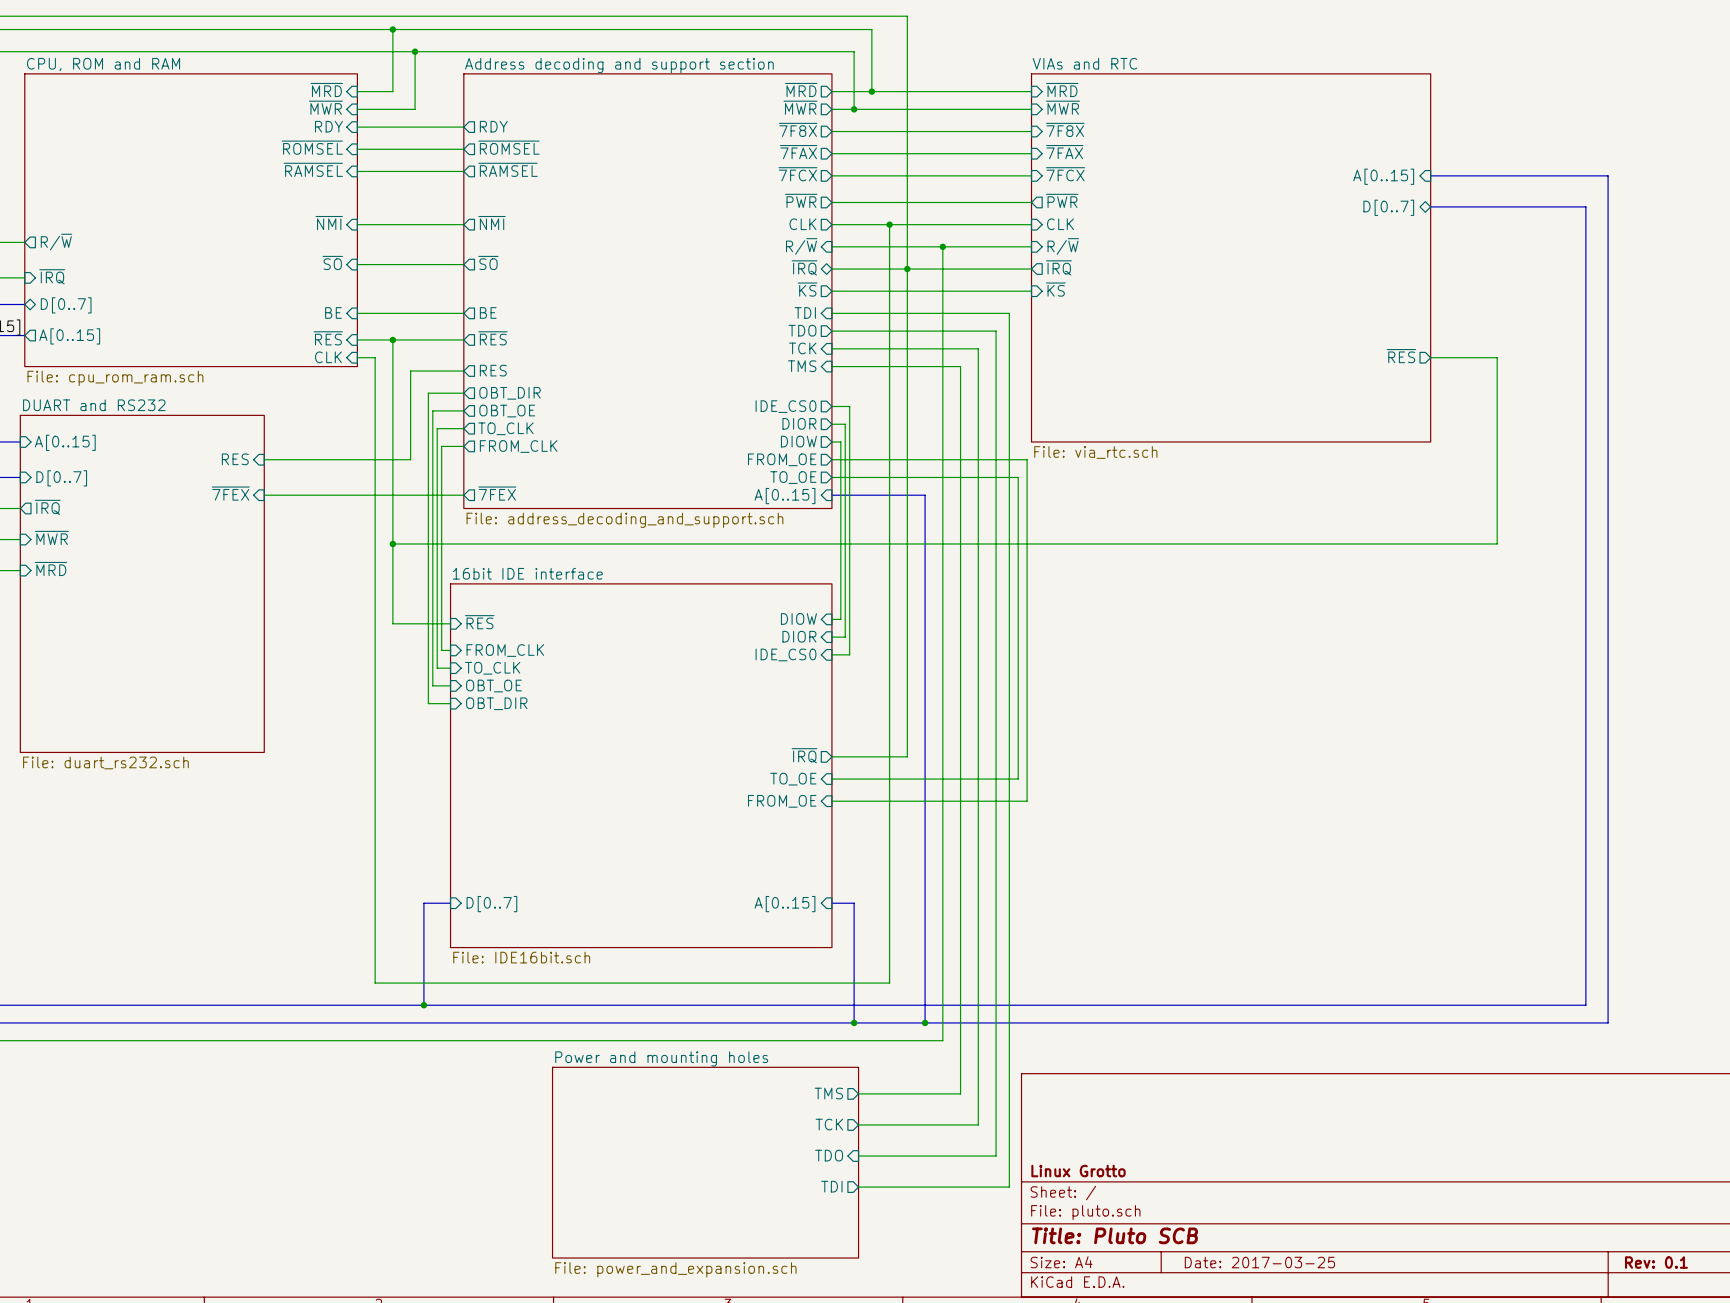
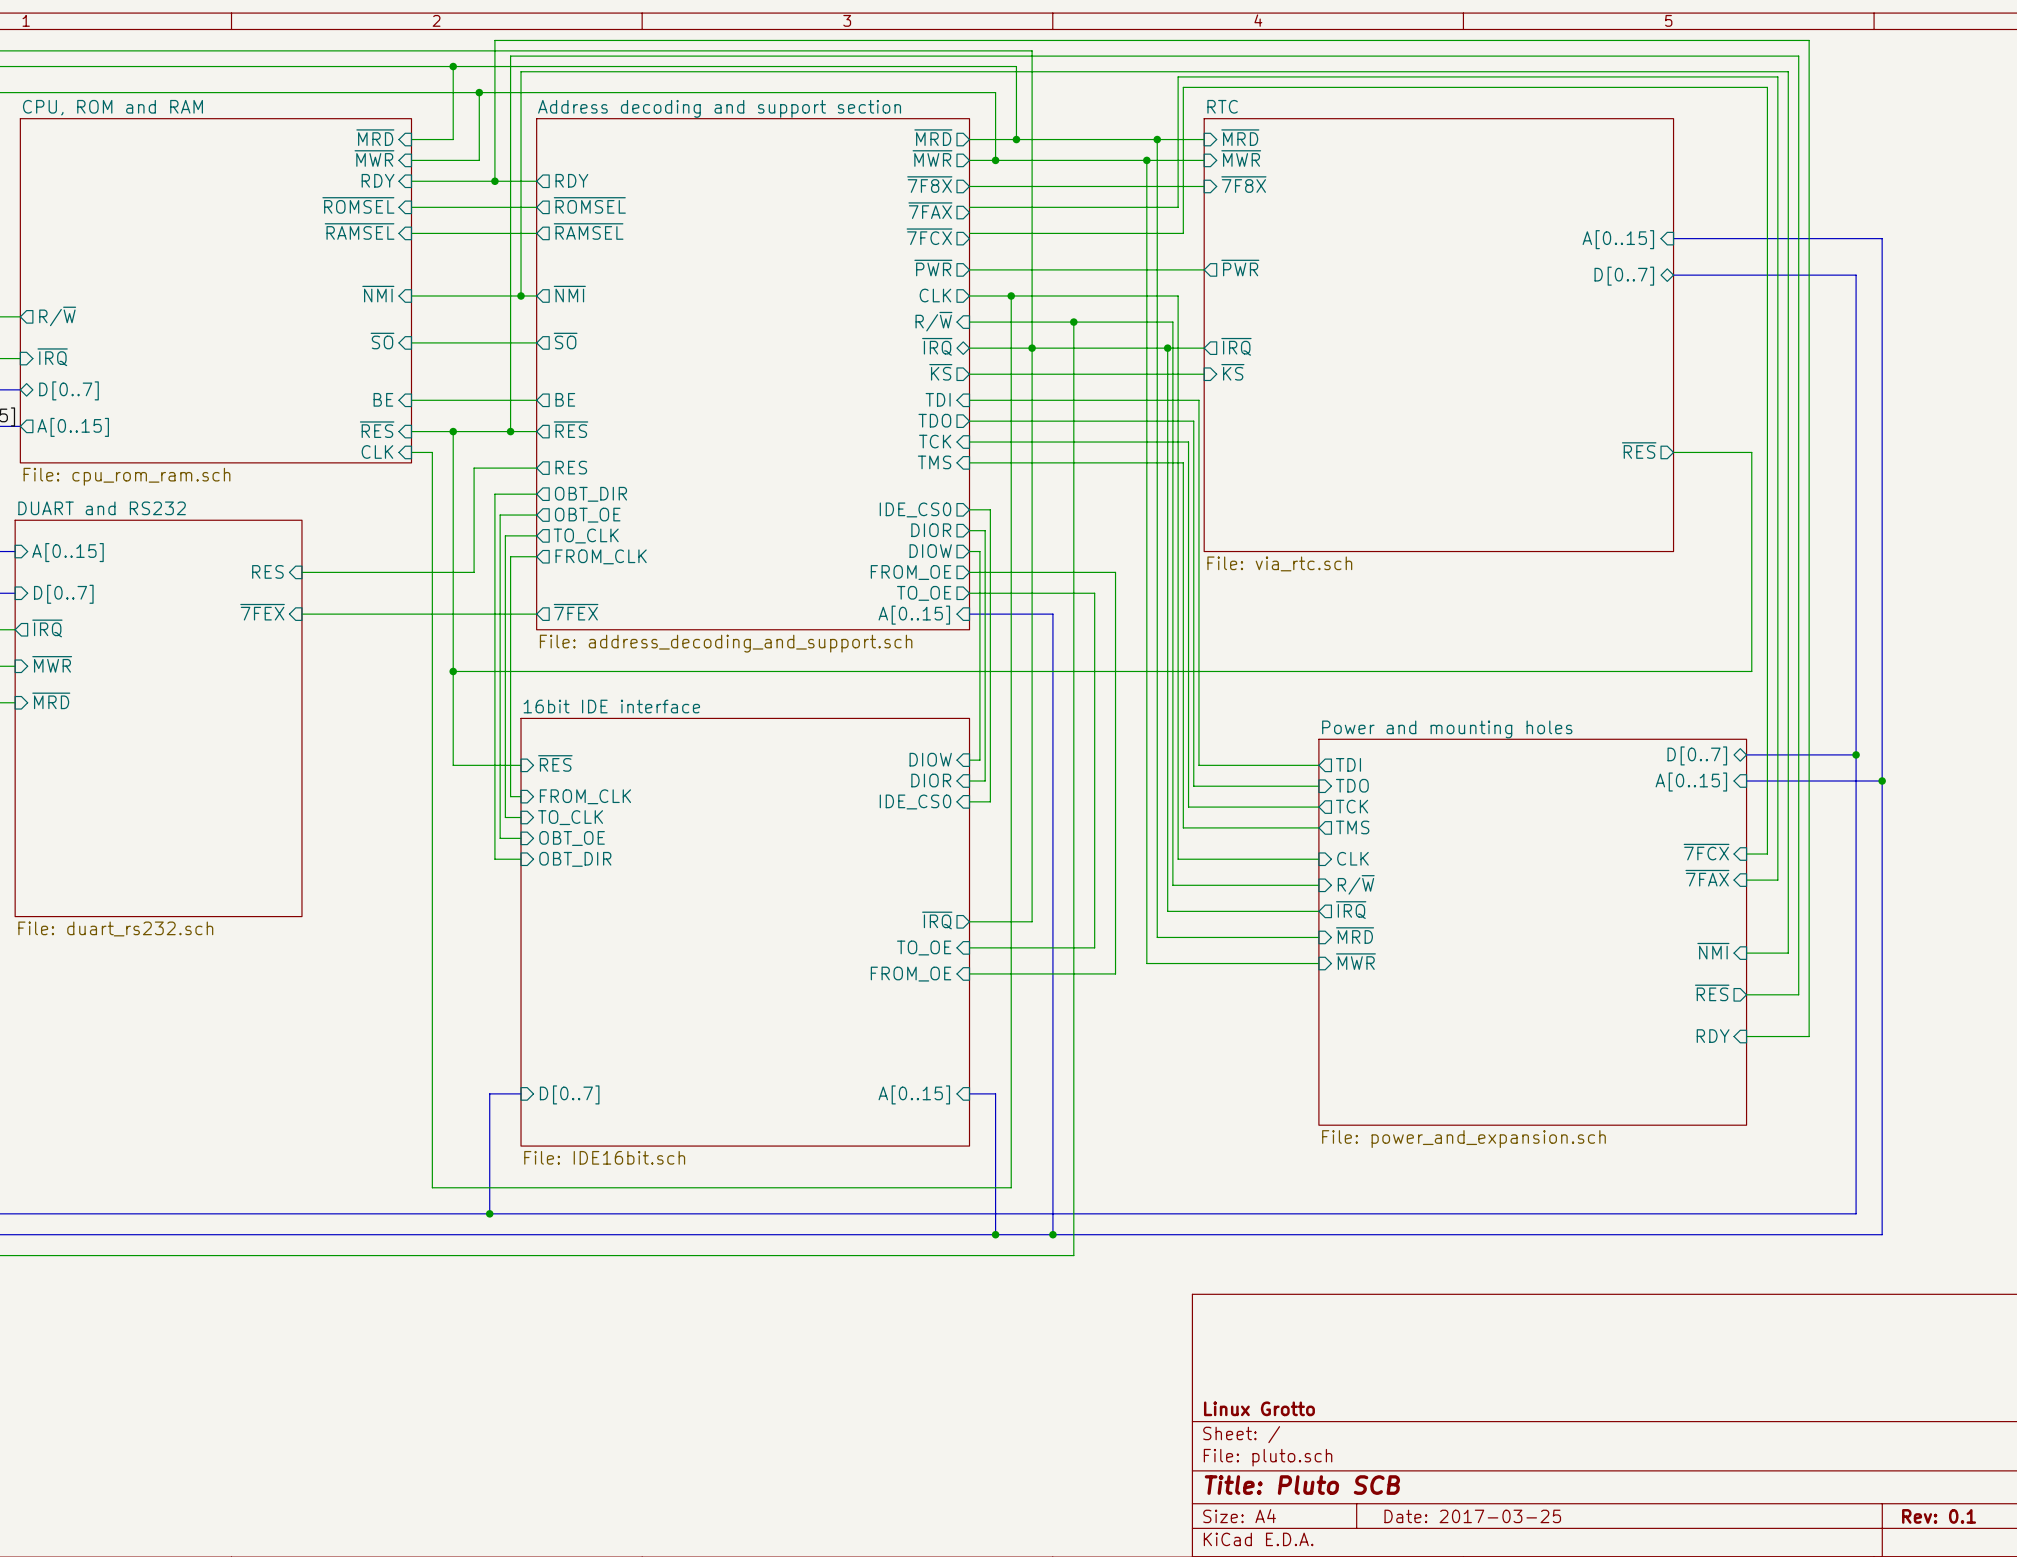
wire: (885, 16) (907, 16) (907, 756) (885, 756) -> (1032, 50) (1032, 921)
sheet VIAs and RTC name: VIAs and RTC (1084, 63) -> RTC (1222, 106)
wire: none -> (1157, 139) (1157, 937) (1318, 937)
junction: none -> (1157, 139)
wire: none -> (1146, 160) (1146, 963) (1318, 963)
junction: none -> (1146, 160)
wire: none -> (494, 181) (494, 40) (1809, 40) (1809, 1036) (1746, 1036)
junction: none -> (494, 181)
wire: none -> (969, 207) (1178, 207) (1178, 76) (1777, 76) (1777, 880) (1746, 880)
sheet pin: ~{7FAX} (1064, 152) -> none
wire: (831, 153) (1031, 153) -> none
wire: none -> (969, 233) (1183, 233) (1183, 87) (1767, 87) (1767, 854) (1746, 854)
sheet pin: ~{7FCX} (1065, 174) -> none
wire: (831, 175) (1031, 175) -> none
wire: none -> (521, 295) (521, 71) (1788, 71) (1788, 953) (1746, 953)
junction: none -> (521, 295)
junction: none -> (1011, 295)
wire: (889, 224) (889, 983) (867, 983) -> (1011, 295) (1011, 1187)
junction: (889, 224) -> none
wire: (1009, 224) (1031, 224) -> (1178, 295) (1178, 400) (1198, 400) (1198, 572)
sheet pin: CLK (1060, 224) -> none
junction: none -> (1073, 322)
wire: (942, 246) (942, 1040) (920, 1040) -> (1073, 322) (1073, 1255)
junction: (942, 246) -> none
wire: (1004, 246) (1031, 246) -> (1172, 322) (1172, 885) (1318, 885)
sheet pin: R/~{W} (1063, 246) -> none
junction: none -> (1032, 348)
junction: (907, 269) -> none
wire: none -> (1167, 348) (1167, 911) (1318, 911)
junction: none -> (1167, 348)
wire: (996, 331) (996, 1156) (858, 1156) -> (1162, 421) (1193, 421) (1193, 786) (1318, 786)
wire: none -> (510, 431) (510, 56) (1798, 56) (1798, 994) (1746, 994)
junction: none -> (510, 431)
wire: (978, 348) (978, 1124) (858, 1124) -> none
wire: (960, 366) (960, 1093) (858, 1093) -> (1120, 462) (1183, 462) (1183, 827) (1318, 827)
wire: (956, 459) (1027, 459) -> none
wire: (938, 477) (1018, 477) -> (1141, 442) (1188, 442) (1188, 593)
bus: (902, 495) (925, 495) (925, 1022) -> (1052, 614) (1052, 1234)
bus: none -> (1746, 754) (1856, 754)
junction: none -> (1856, 754)
sheet pin: none -> D[0..7] (1697, 755)
wire: (1027, 623) (1027, 801) (956, 801) -> (1115, 572) (1115, 973)
wire: none -> (1198, 765) (1318, 765)
sheet pin: none -> TDI (1348, 764)
sheet pin: none -> A[0..15] (1691, 782)
bus: none -> (1746, 780) (1882, 780)
junction: none -> (1882, 780)
sheet pin: none -> TDO (1352, 785)
sheet pin: none -> TCK (1352, 806)
wire: (1018, 659) (1018, 779) (938, 779) -> (1094, 593) (1094, 947)
wire: none -> (1188, 807) (1318, 807)
sheet pin: none -> TMS (1352, 827)
sheet pin: none -> ~{7FCX} (1706, 852)
wire: (1009, 703) (1009, 1187) (858, 1187) -> (1178, 859) (1318, 859)
sheet pin: none -> CLK (1352, 858)
sheet pin: none -> ~{7FAX} (1707, 878)
sheet pin: none -> R/~{W} (1356, 884)
sheet pin: none -> ~{IRQ} (1351, 910)
sheet Power and mounting holes: none -> File: power_and_expansion.sch (1532, 932)
sheet pin: none -> ~{MRD} (1355, 935)
sheet pin: none -> ~{NMI} (1713, 951)
sheet pin: none -> ~{MWR} (1355, 961)
sheet pin: none -> ~{RES} (1712, 992)
sheet pin: none -> RDY (1713, 1036)
junction position: (925, 1022) -> (1052, 1234)
sheet pin: TMS (828, 1093) -> none
sheet pin: TCK (829, 1124) -> none
sheet pin: TDO (829, 1155) -> none
sheet Power and mounting holes: File: power_and_expansion.sch (705, 1162) -> none
sheet pin: TDI (831, 1186) -> none

